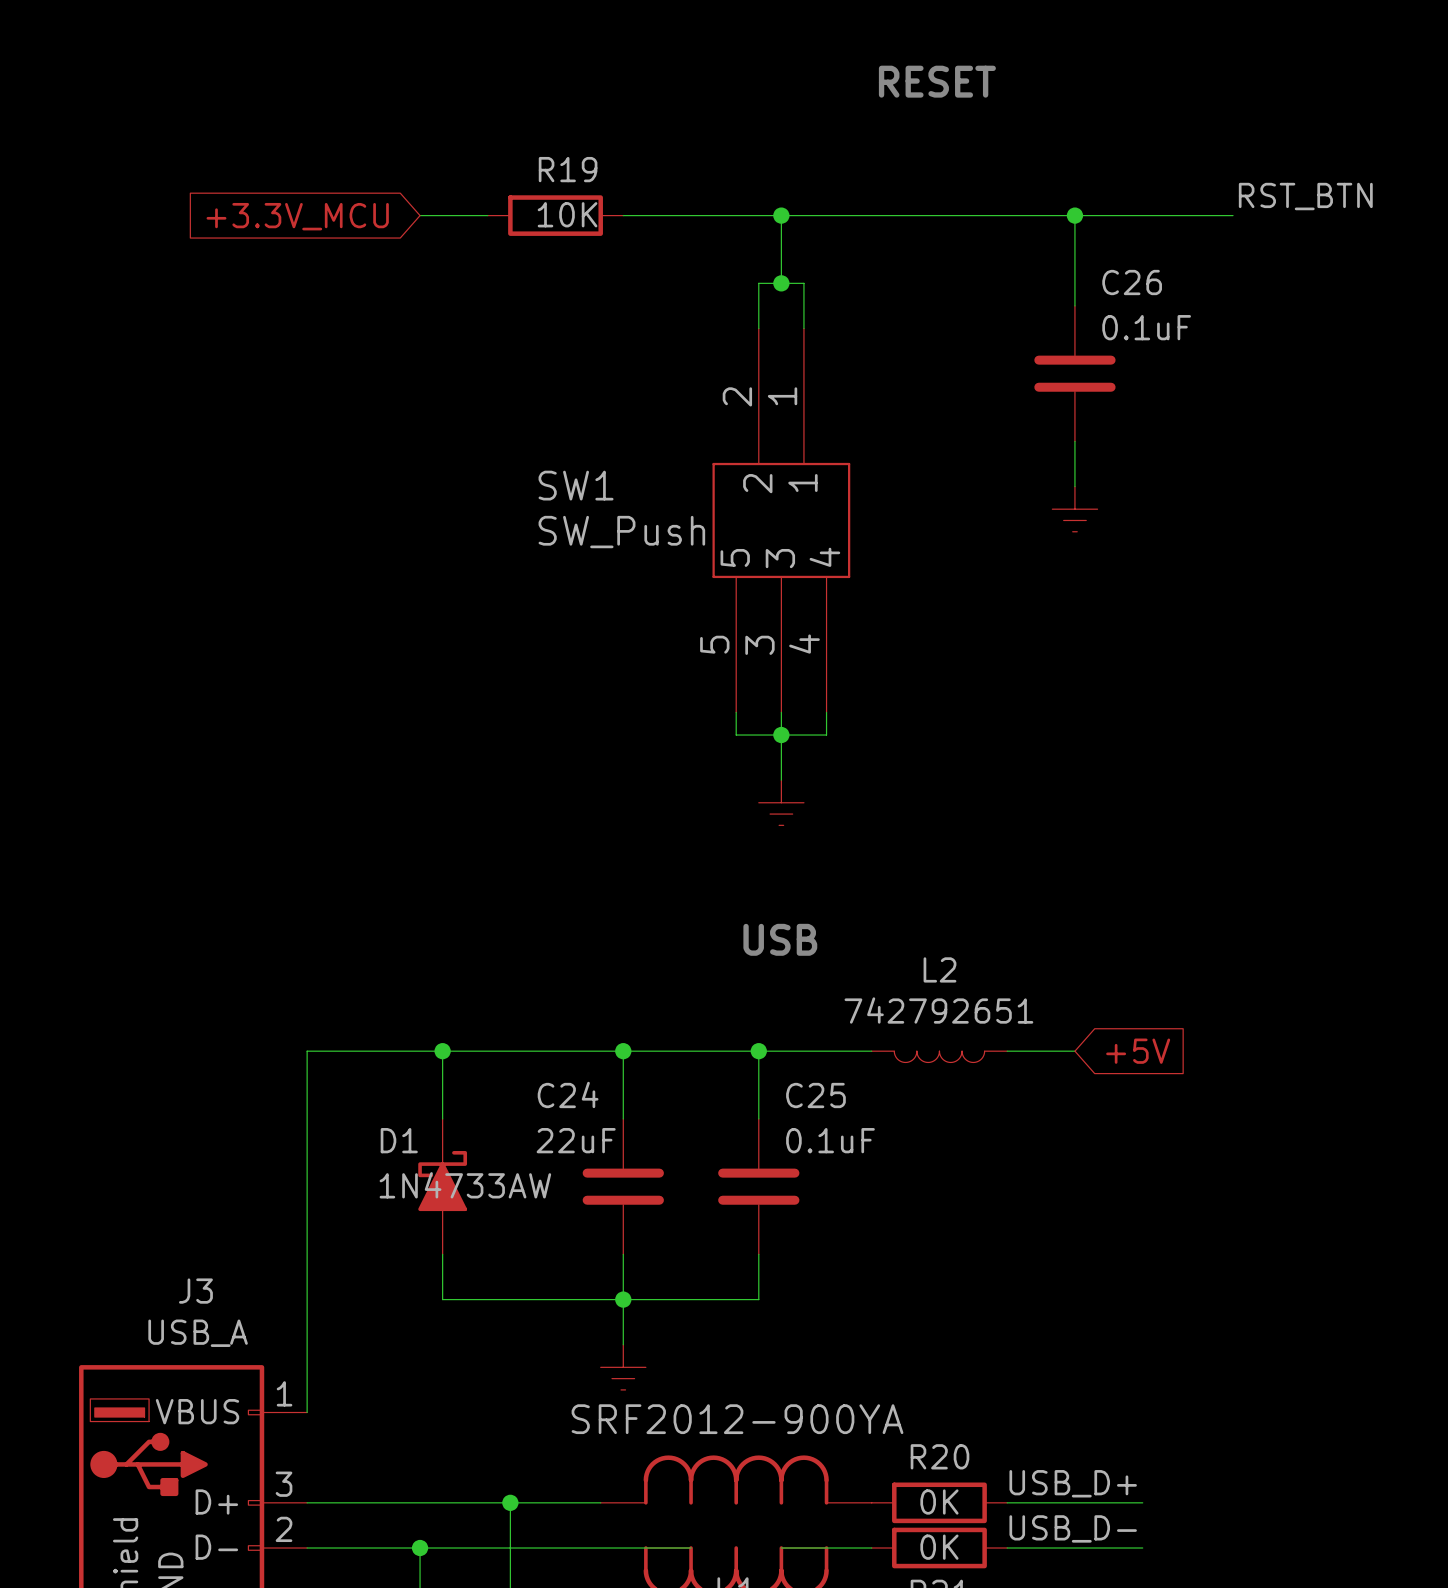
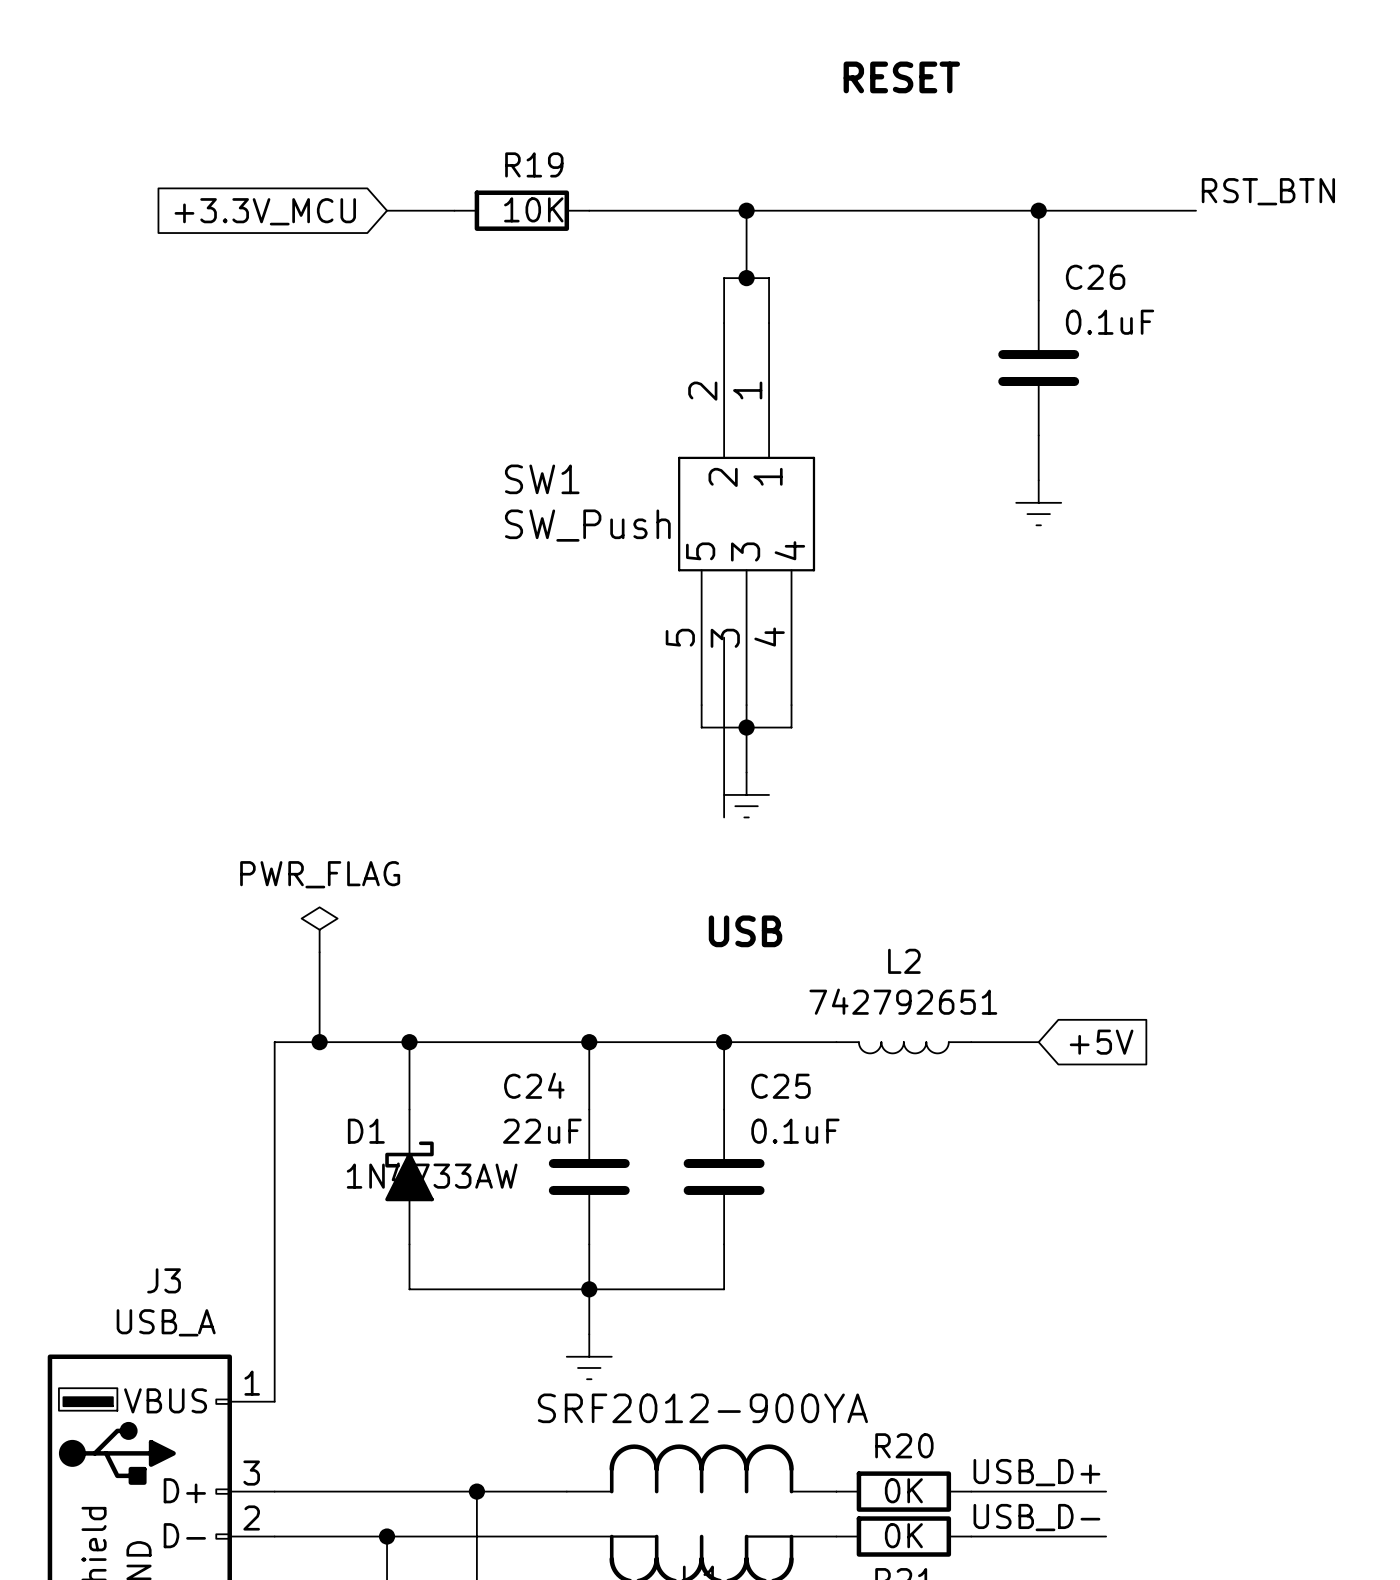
bus: none -> (724, 637) (724, 817)
power symbol: none -> PWR_FLAG (319, 929)
wire: none -> (319, 952) (319, 1042)
junction: none -> (319, 1042)

